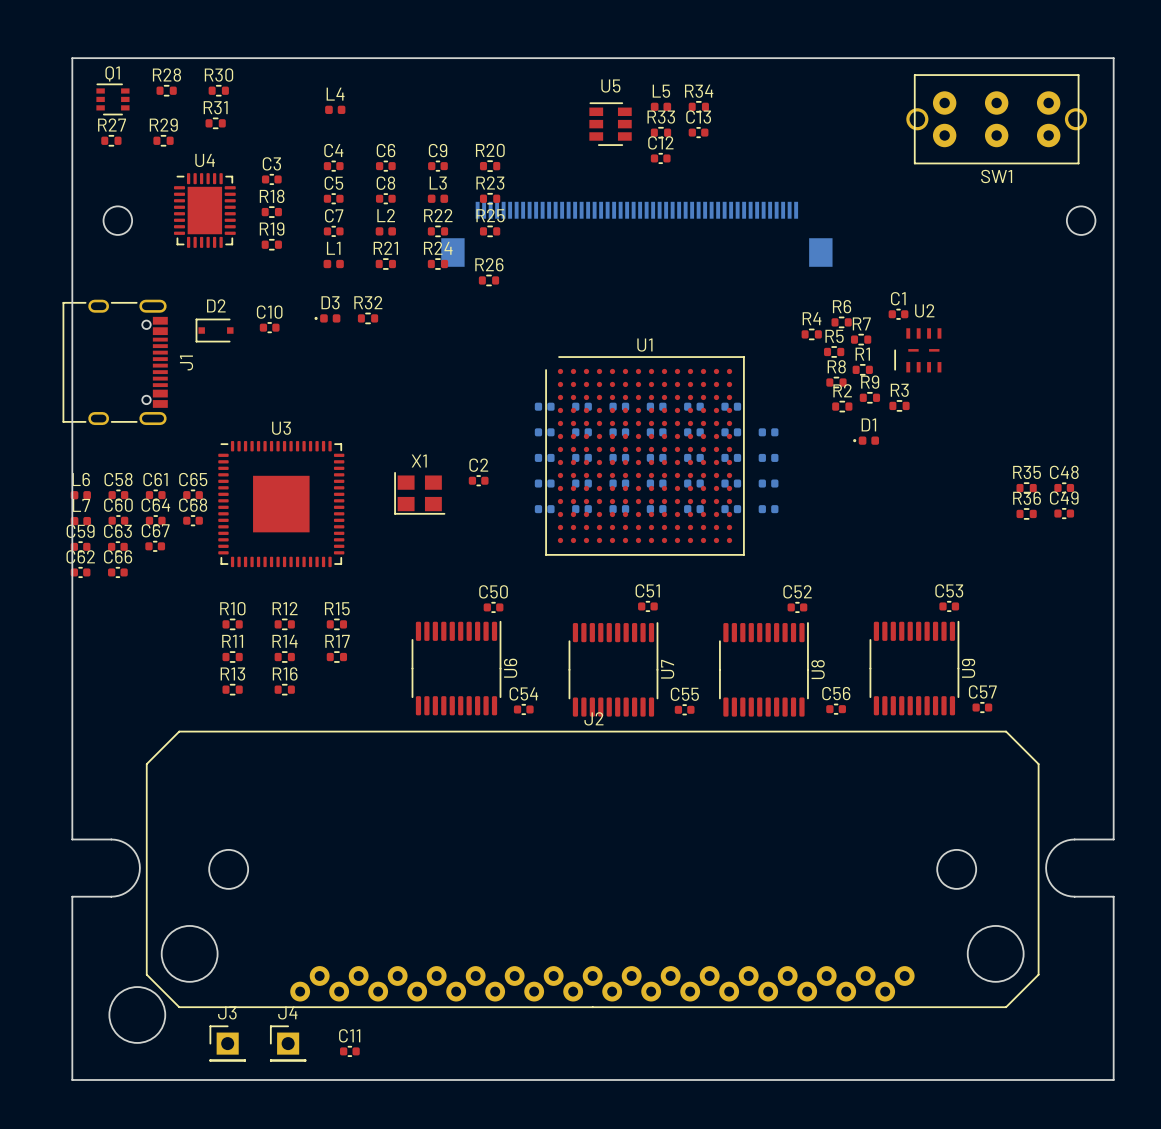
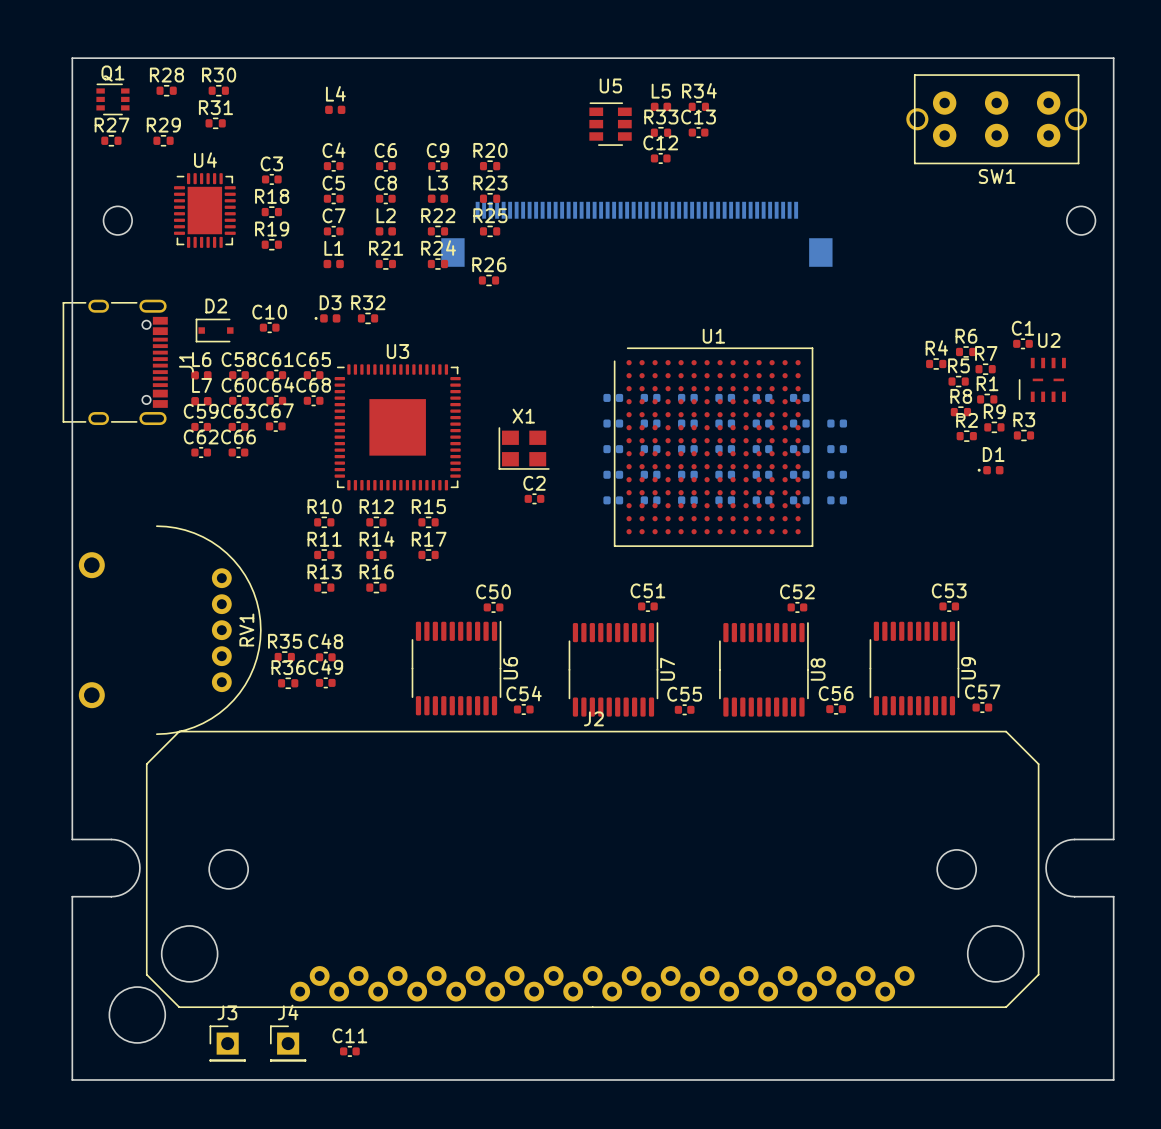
C1 position: (898, 314) -> (1022, 343)
R6 position: (841, 322) -> (966, 351)
R4 position: (811, 334) -> (936, 363)
R7 position: (861, 339) -> (985, 369)
U2 position: (917, 350) -> (1042, 379)
R5 position: (834, 351) -> (958, 381)
R1 position: (862, 369) -> (987, 399)
R8 position: (836, 382) -> (960, 412)
part: none -> (613, 397)
part: none -> (650, 397)
part: none -> (687, 397)
part: none -> (725, 397)
part: none -> (762, 397)
part: none -> (799, 397)
R9 position: (869, 397) -> (994, 427)
R3 position: (899, 405) -> (1023, 435)
part: (544, 406) -> none
part: (582, 406) -> none
part: (619, 406) -> none
part: (656, 406) -> none
part: (693, 406) -> none
part: (731, 406) -> none
R2 position: (842, 406) -> (966, 436)
part: none -> (613, 423)
part: none -> (650, 423)
part: none -> (687, 423)
part: none -> (725, 423)
part: none -> (762, 423)
part: none -> (799, 423)
part: none -> (837, 423)
part: (544, 432) -> none
part: (582, 432) -> none
part: (619, 432) -> none
part: (656, 432) -> none
part: (693, 432) -> none
part: (731, 432) -> none
part: (768, 432) -> none
D1 position: (866, 440) -> (990, 470)
part: none -> (613, 449)
part: none -> (650, 449)
part: none -> (687, 449)
part: none -> (725, 449)
part: none -> (762, 449)
part: none -> (799, 449)
part: none -> (837, 449)
U1 position: (645, 455) -> (713, 447)
part: (544, 457) -> none
part: (582, 457) -> none
part: (619, 457) -> none
part: (656, 457) -> none
part: (693, 457) -> none
part: (731, 457) -> none
part: (768, 457) -> none
part: none -> (613, 474)
part: none -> (650, 474)
part: none -> (687, 474)
part: none -> (725, 474)
part: none -> (762, 474)
part: none -> (799, 474)
part: none -> (837, 474)
C2 position: (478, 480) -> (534, 498)
part: (544, 483) -> none
part: (582, 483) -> none
part: (619, 483) -> none
part: (656, 483) -> none
part: (693, 483) -> none
part: (731, 483) -> none
part: (768, 483) -> none
C48 position: (1064, 487) -> (325, 657)
R35: (1026, 488) -> none
X1 position: (419, 493) -> (524, 448)
L6 position: (80, 495) -> (201, 375)
C58 position: (118, 495) -> (238, 375)
C61 position: (155, 495) -> (276, 375)
C65 position: (193, 495) -> (313, 375)
part: none -> (613, 500)
part: none -> (650, 500)
part: none -> (687, 500)
part: none -> (725, 500)
part: none -> (762, 500)
part: none -> (799, 500)
part: none -> (837, 500)
U3 position: (281, 504) -> (397, 427)
part: (544, 509) -> none
part: (582, 509) -> none
part: (619, 509) -> none
part: (656, 509) -> none
part: (693, 509) -> none
part: (731, 509) -> none
part: (768, 509) -> none
R36 position: (1026, 513) -> (288, 683)
C49 position: (1064, 513) -> (325, 682)
C60 position: (118, 520) -> (238, 400)
C64 position: (155, 520) -> (276, 400)
C68 position: (193, 520) -> (313, 400)
L7 position: (80, 521) -> (201, 401)
C59 position: (80, 546) -> (201, 426)
C63 position: (117, 546) -> (238, 426)
C67 position: (155, 546) -> (275, 426)
R14: none -> (376, 554)
C62 position: (80, 572) -> (201, 452)
C66 position: (117, 572) -> (238, 452)
R10 position: (232, 624) -> (324, 522)
R12 position: (284, 624) -> (376, 522)
R15 position: (336, 624) -> (428, 522)
RV1: none -> (170, 630)
R14 name: R14 (285, 641) -> R35 (285, 641)
R11 position: (232, 657) -> (324, 554)
R17 position: (336, 657) -> (428, 554)
R13 position: (232, 689) -> (324, 587)
R16 position: (284, 689) -> (376, 587)

